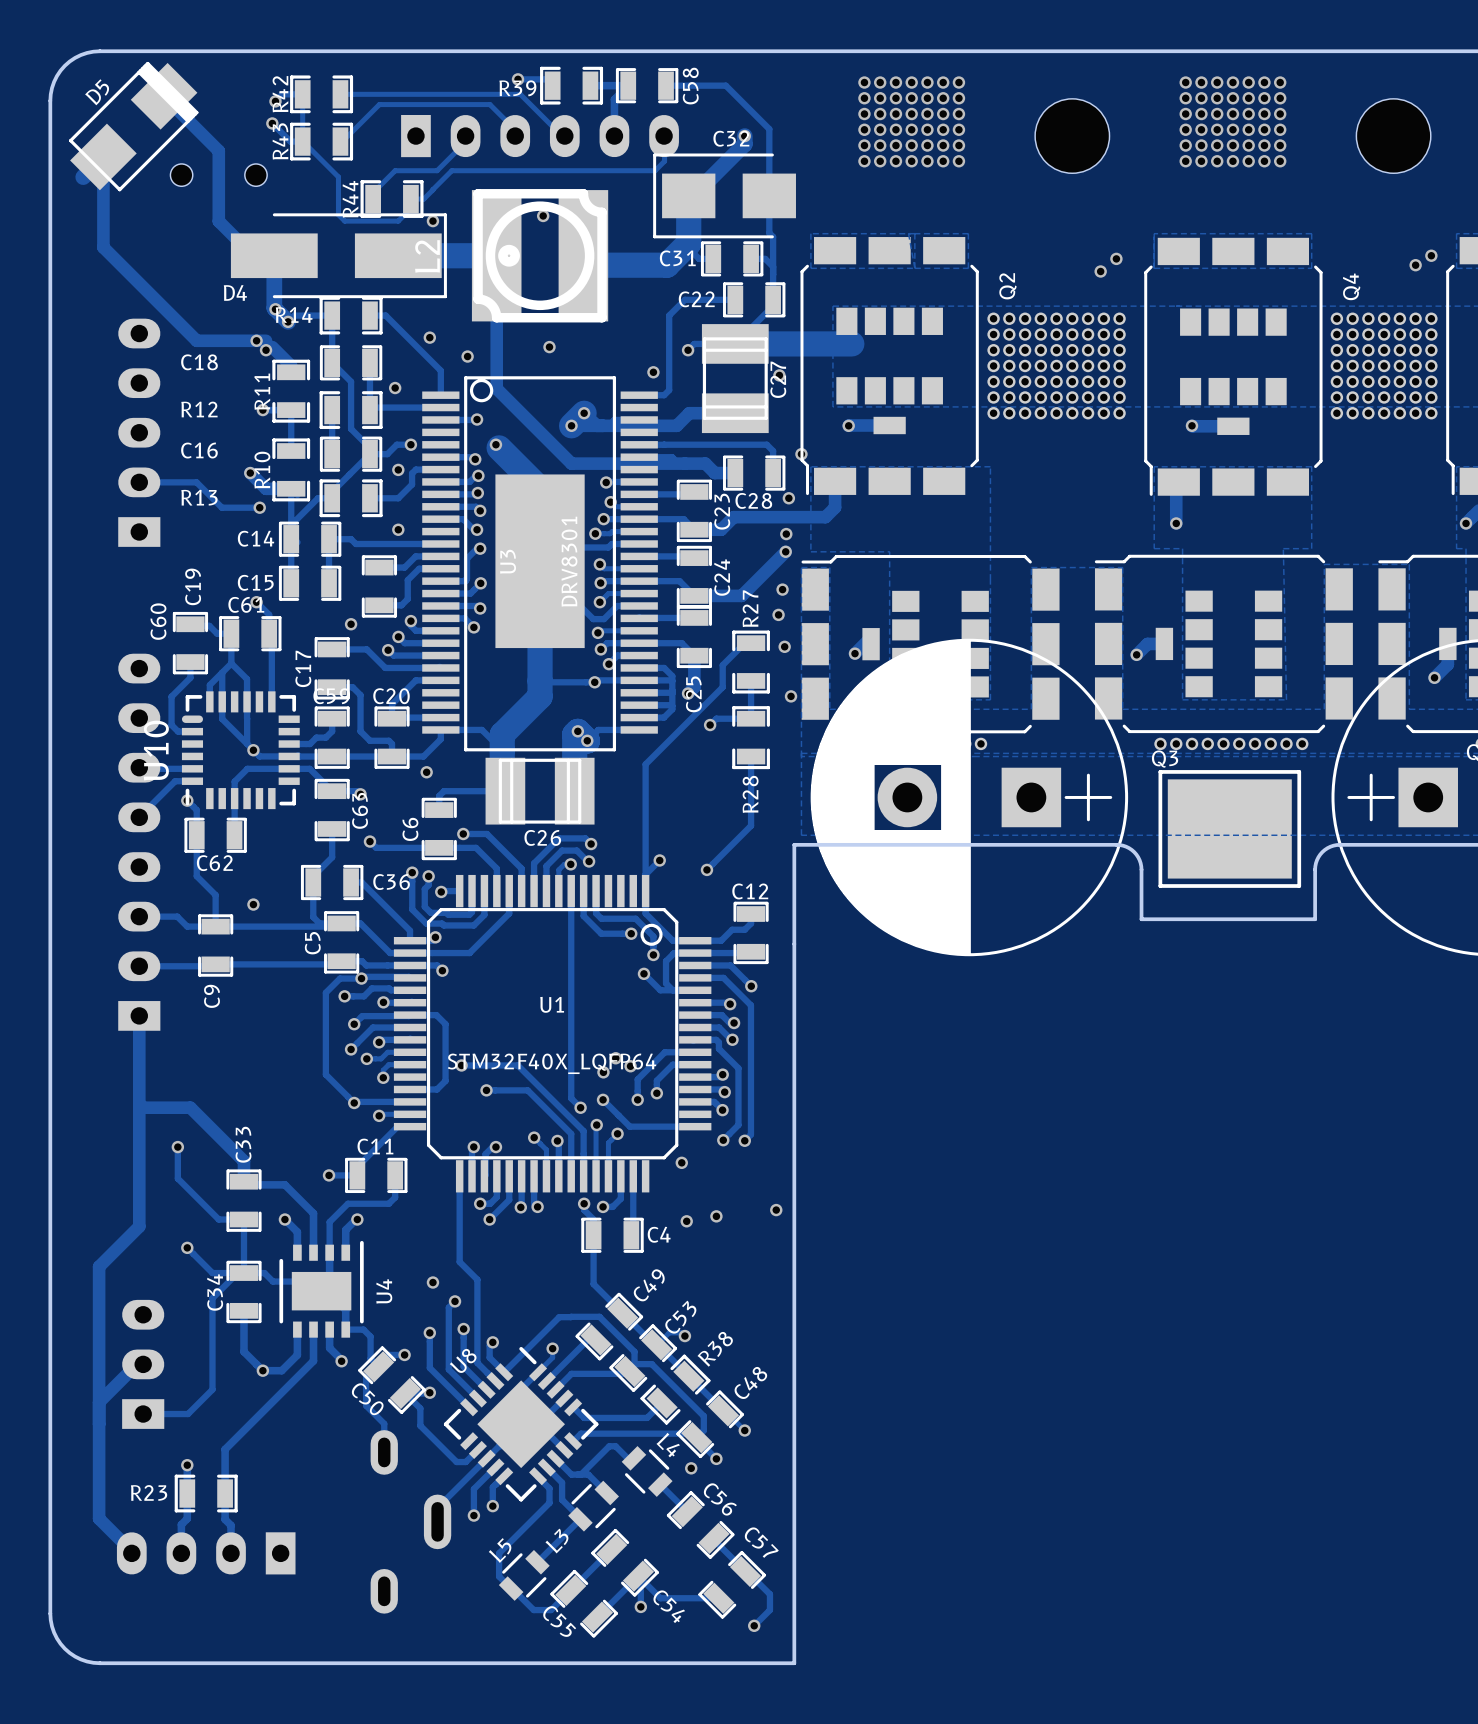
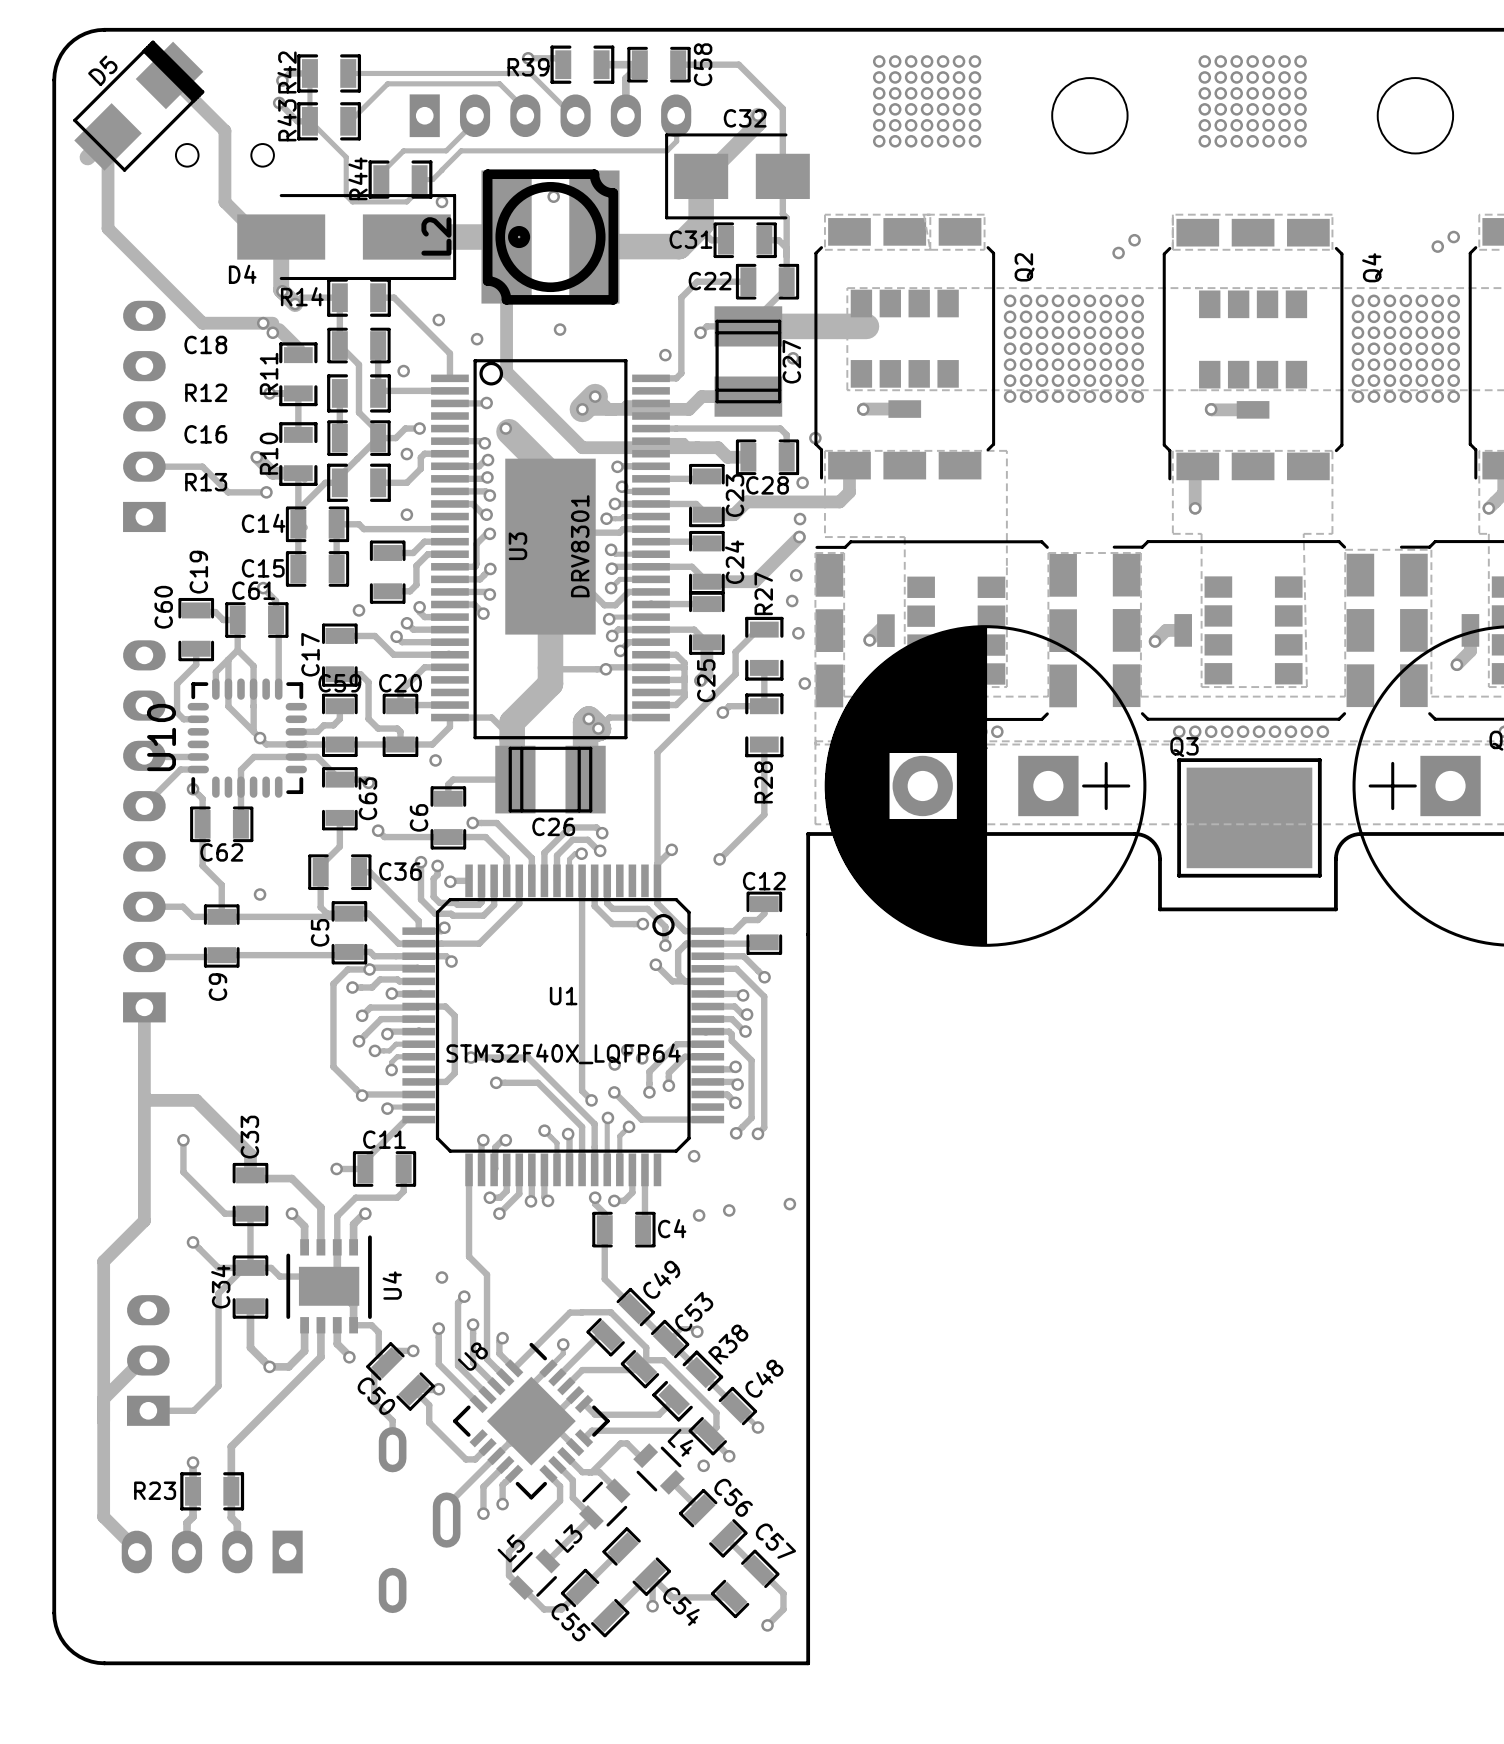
U10 footprint: [181, 691, 300, 810] -> [187, 678, 307, 798]

